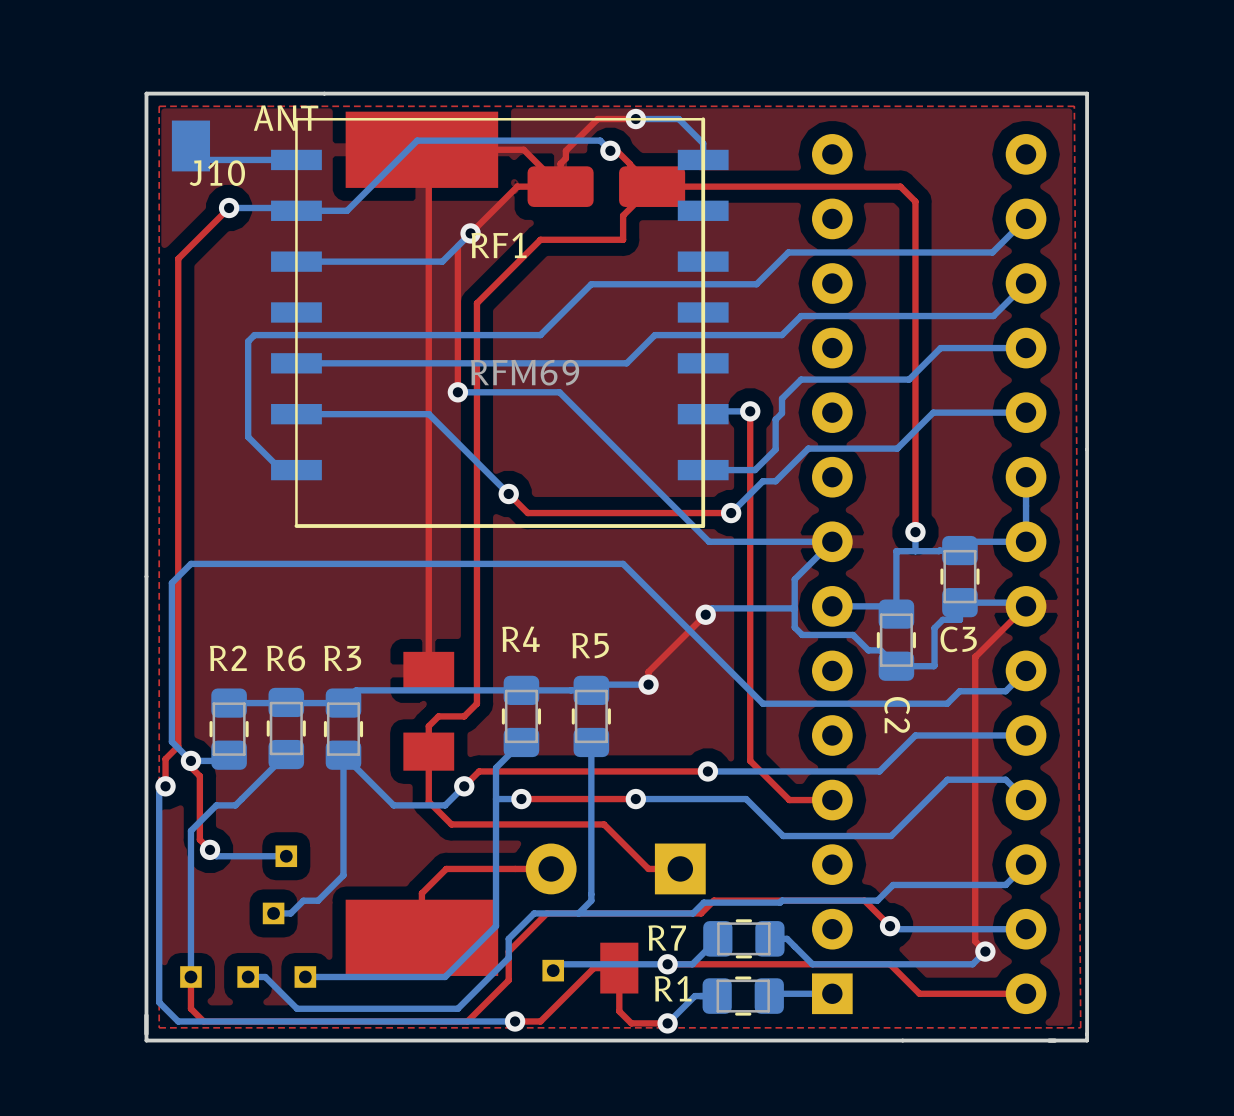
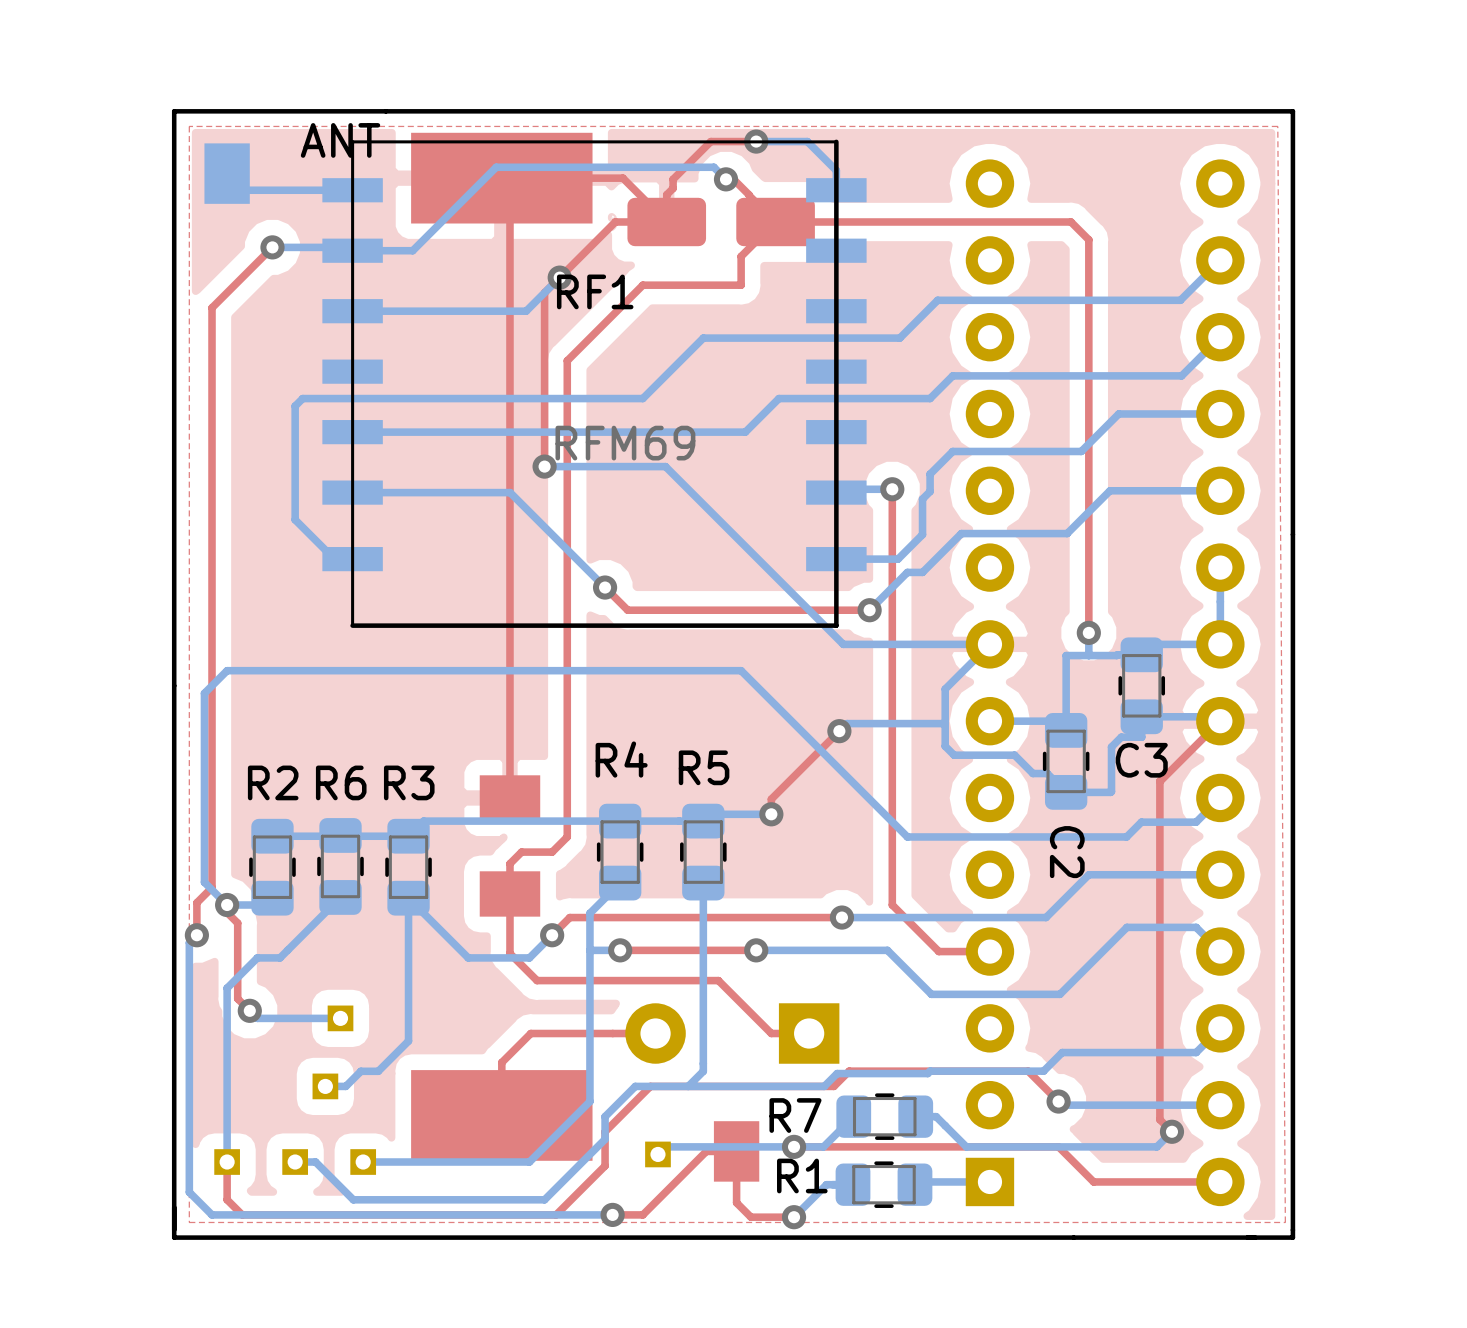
J10 name: J10 (217, 173) -> none

